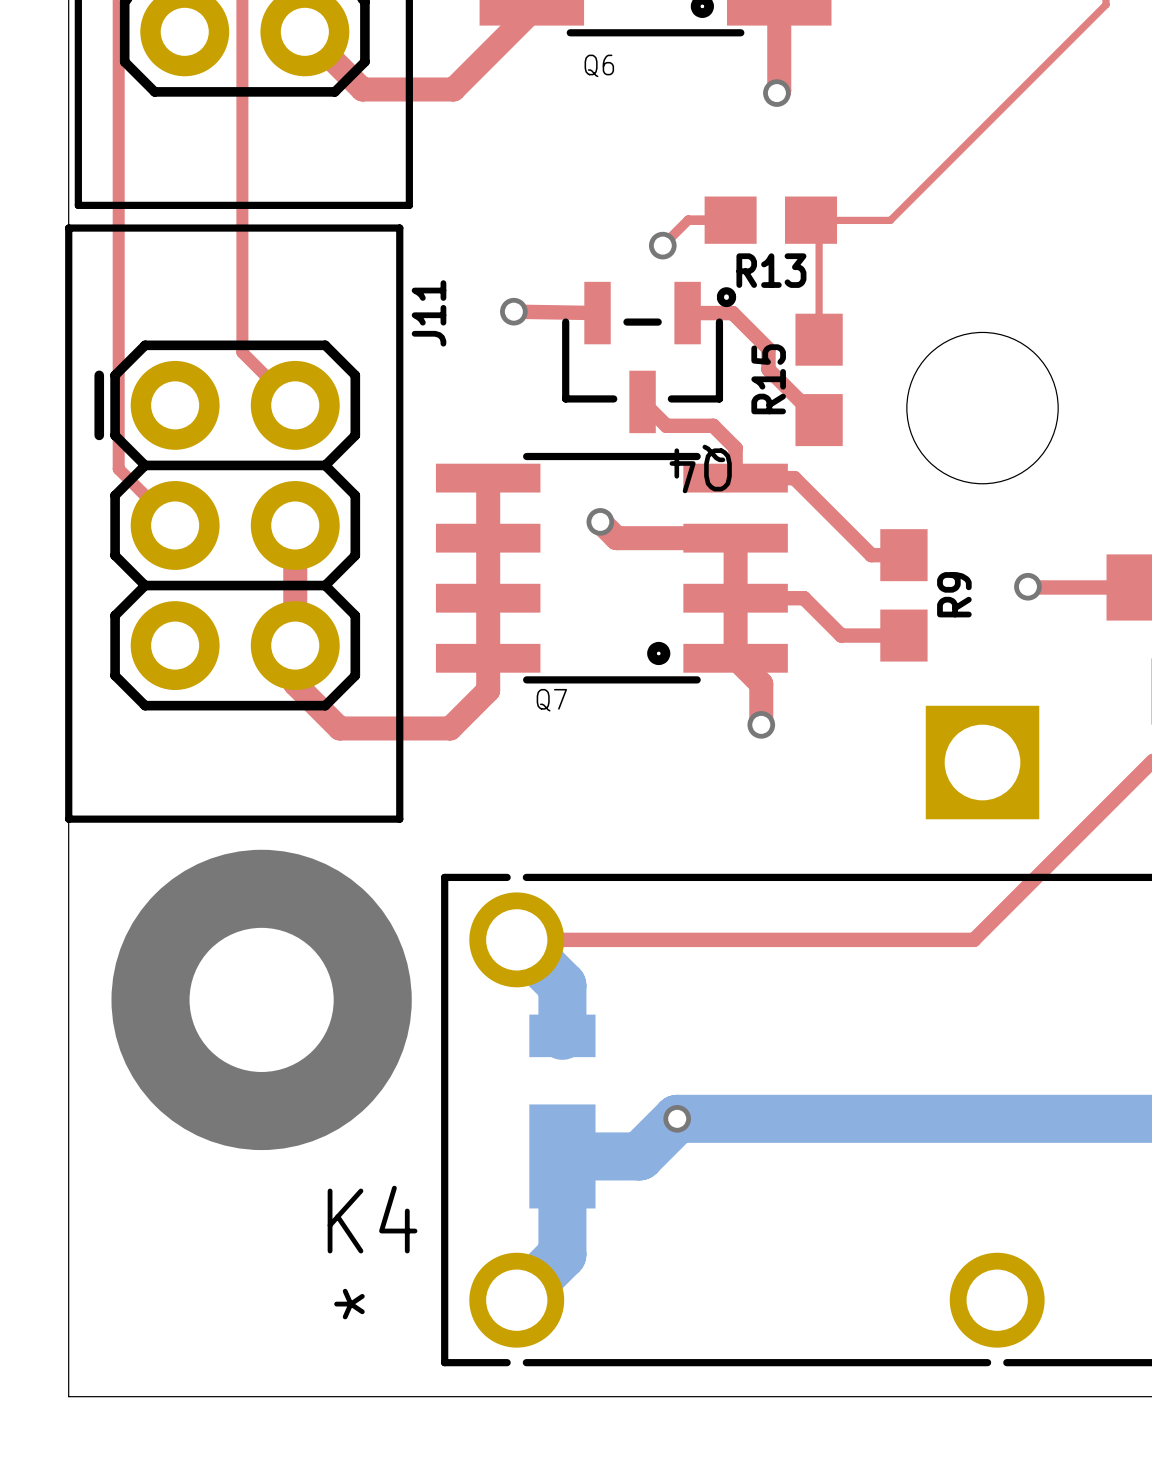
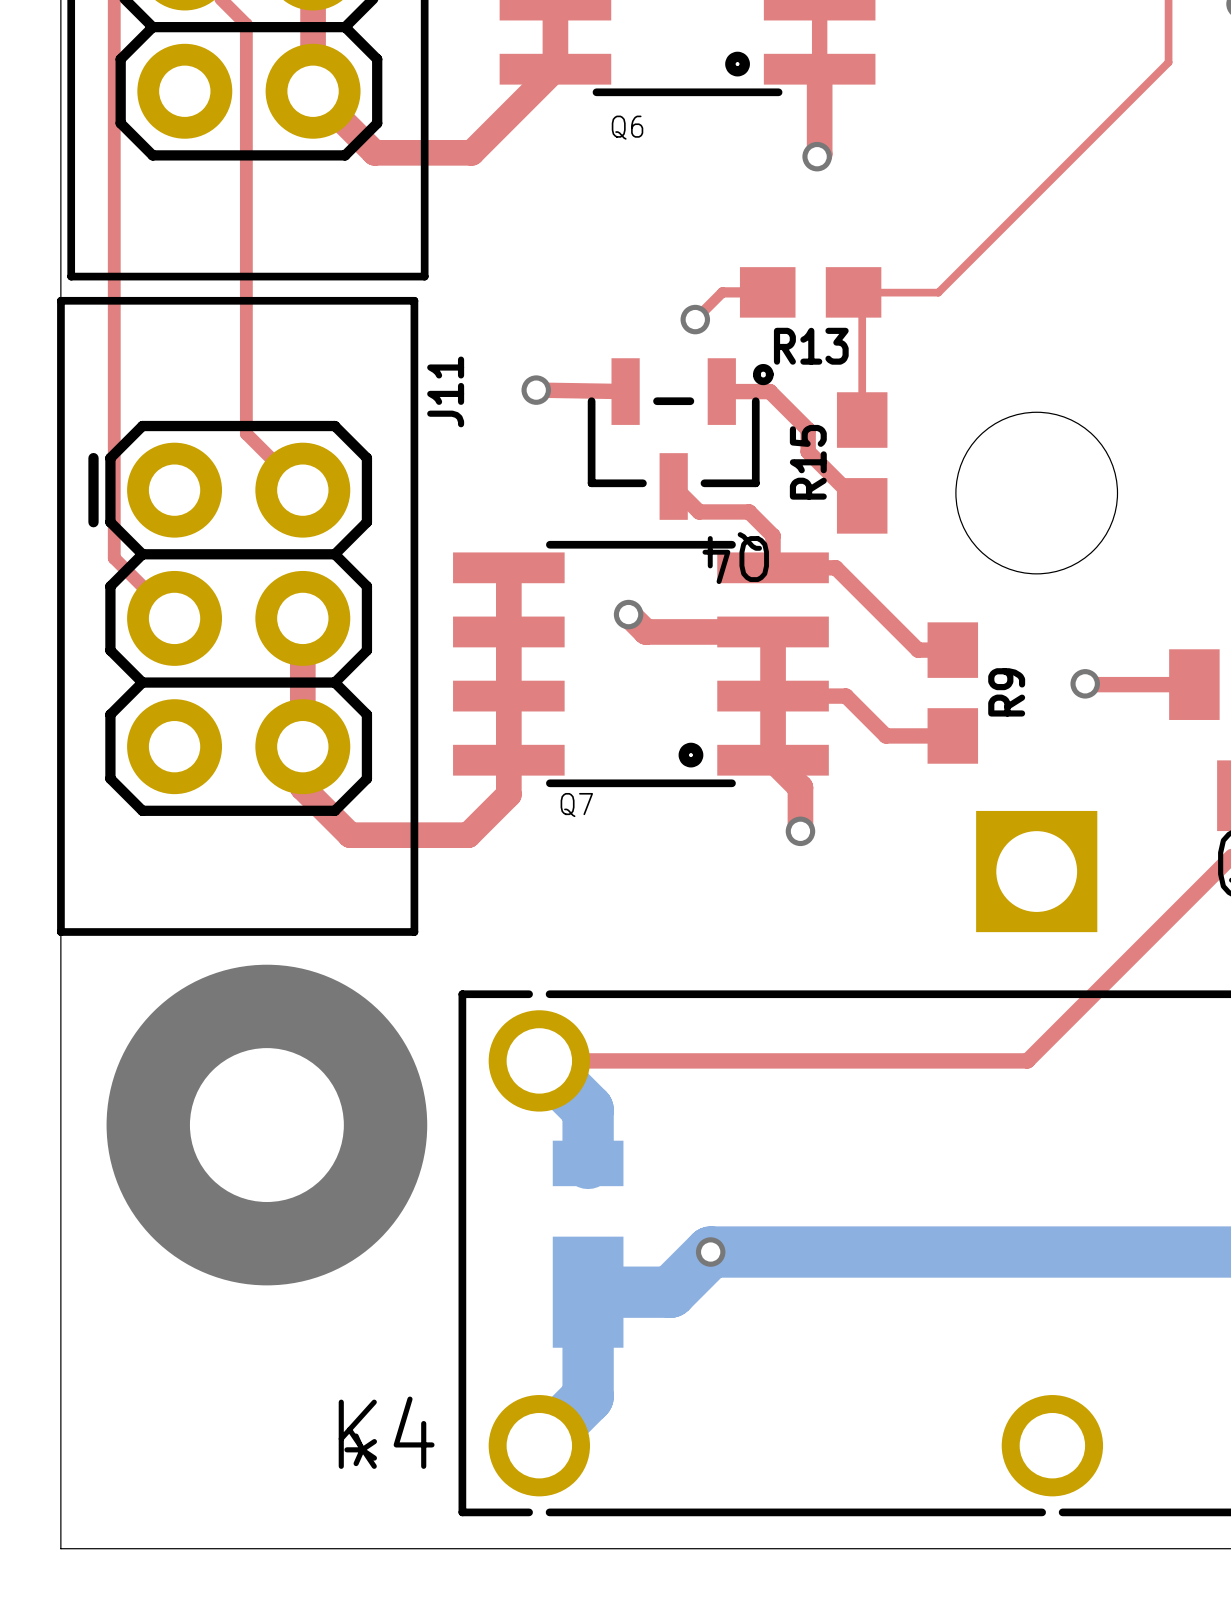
K4 name position: K4 (372, 1219) -> K4 (386, 1432)

